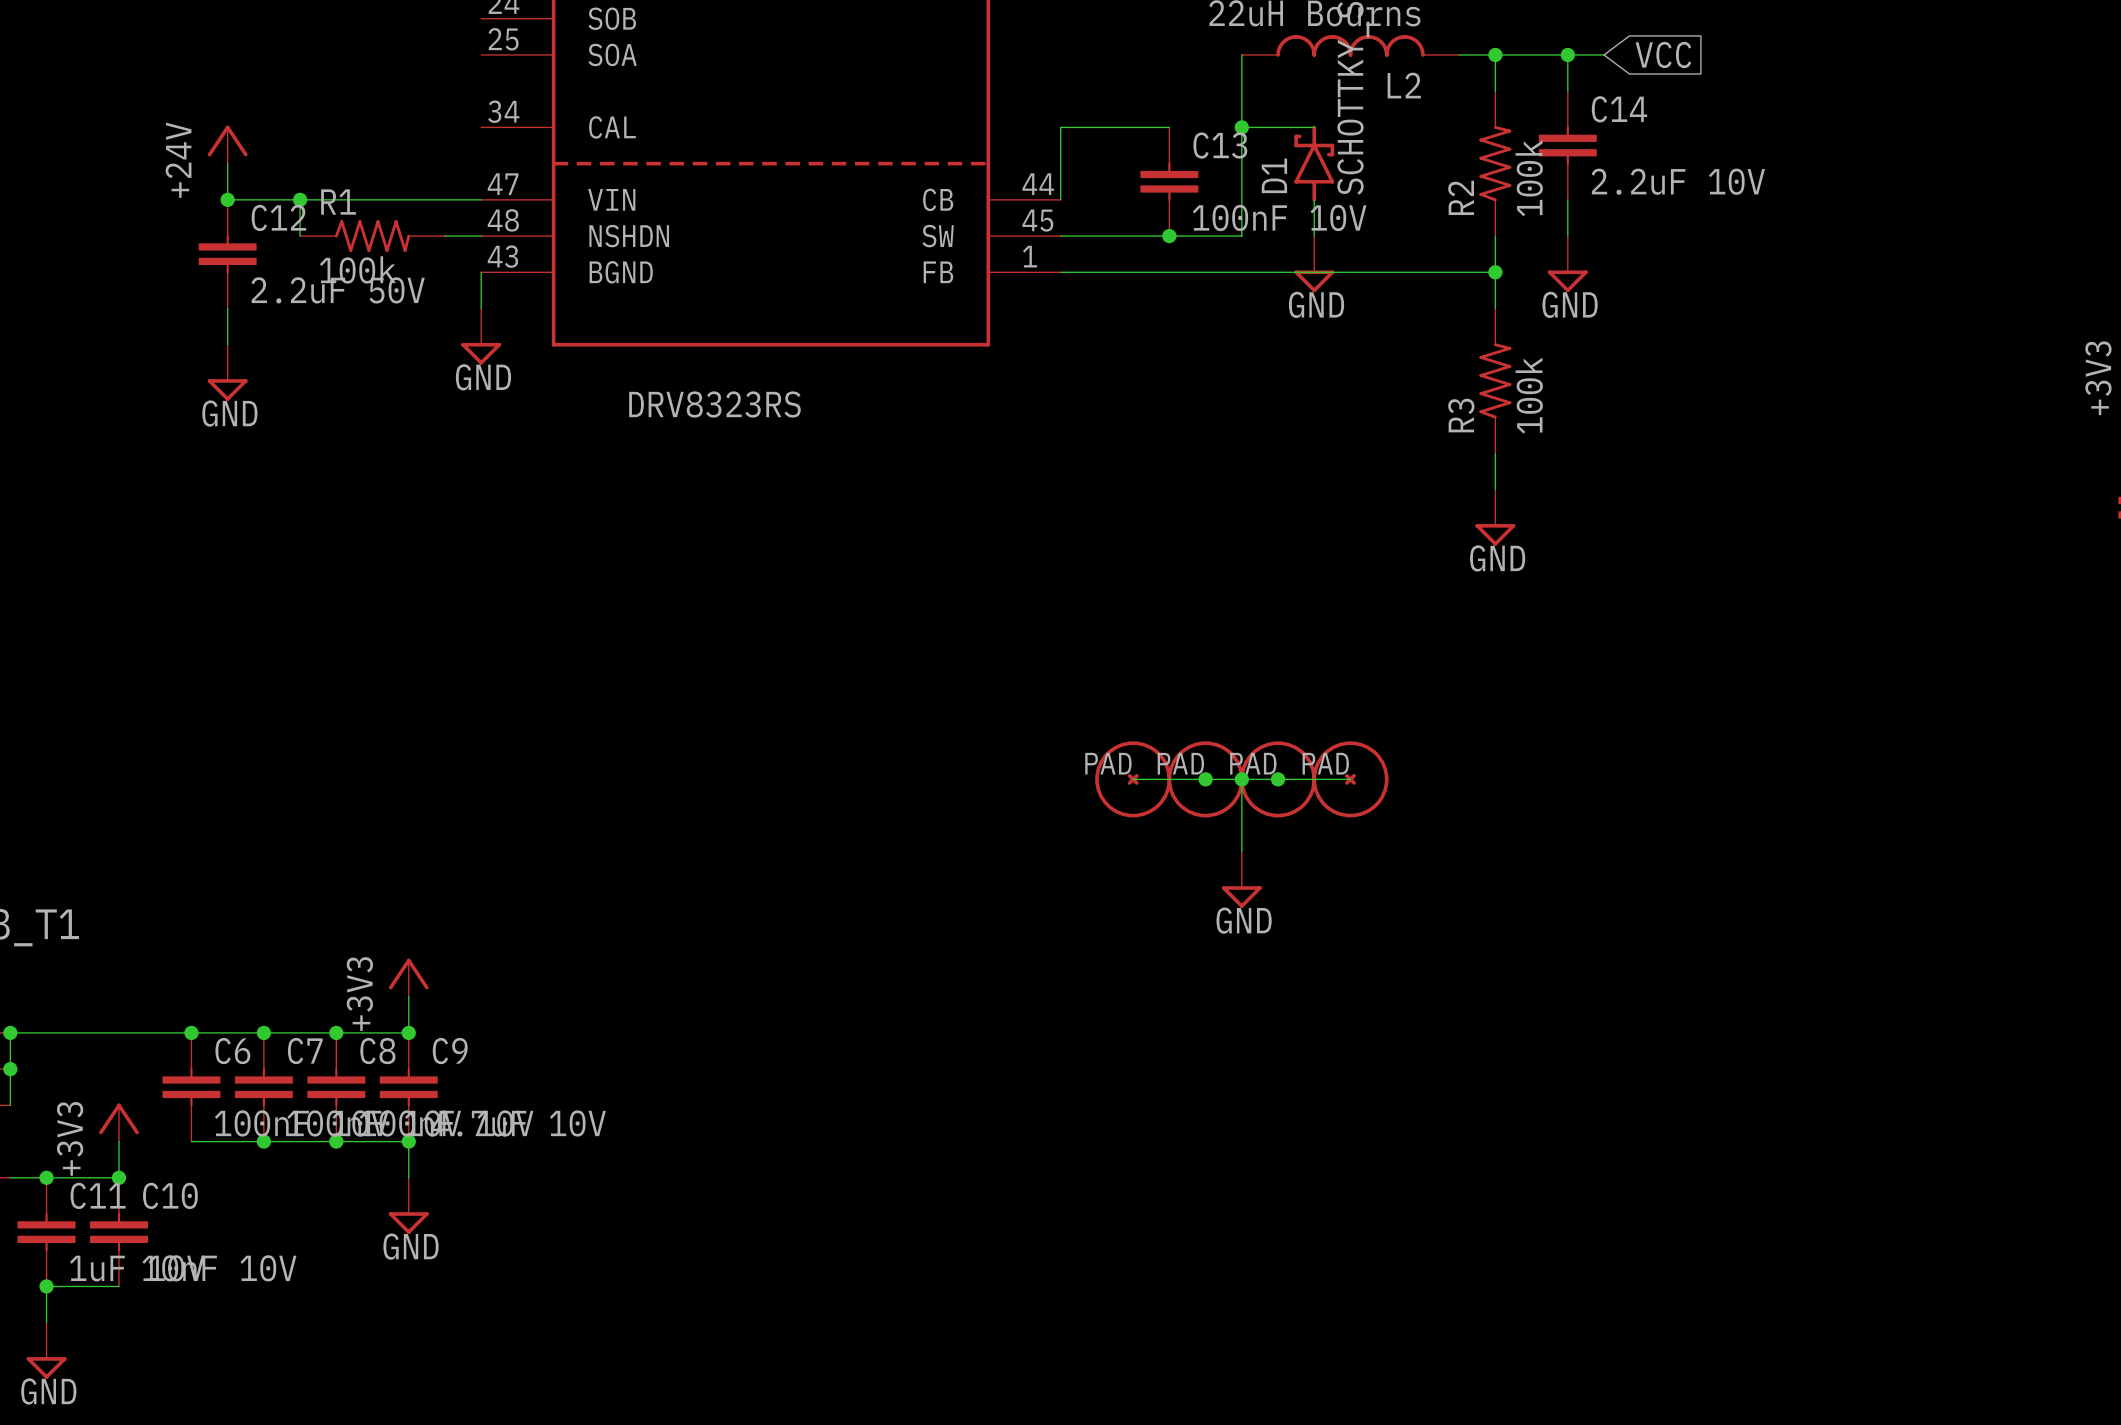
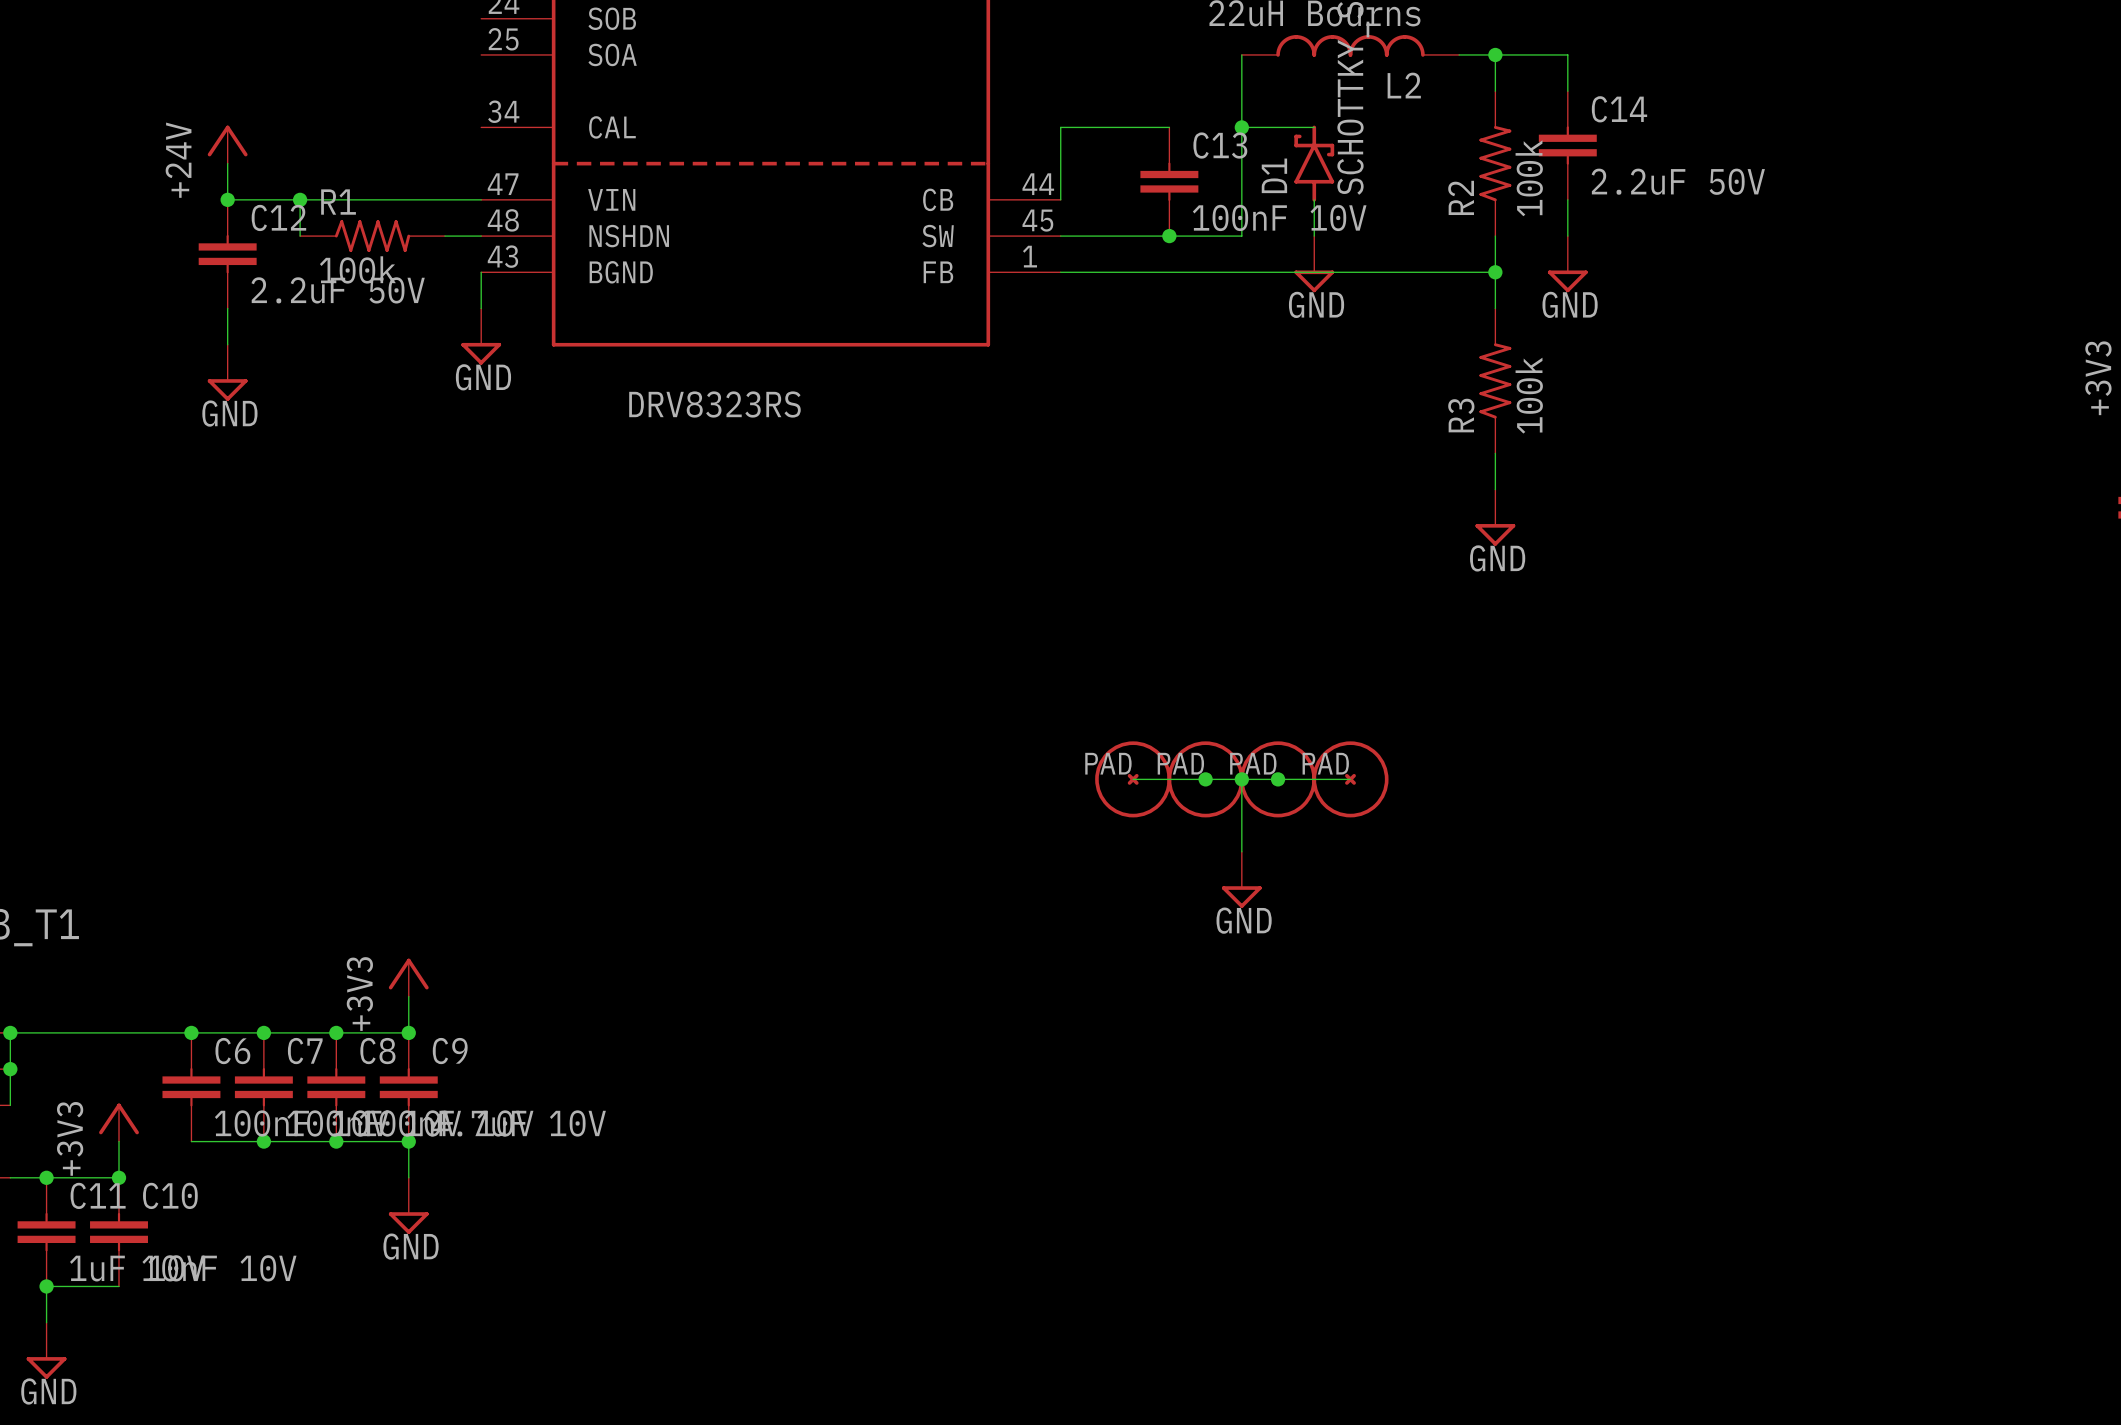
wire: (1567, 54) (1604, 54) -> none
junction: (1567, 54) -> none
global label: VCC (1663, 54) -> none
C14 value: 2.2uF 10V (1678, 181) -> 2.2uF 50V (1678, 181)

